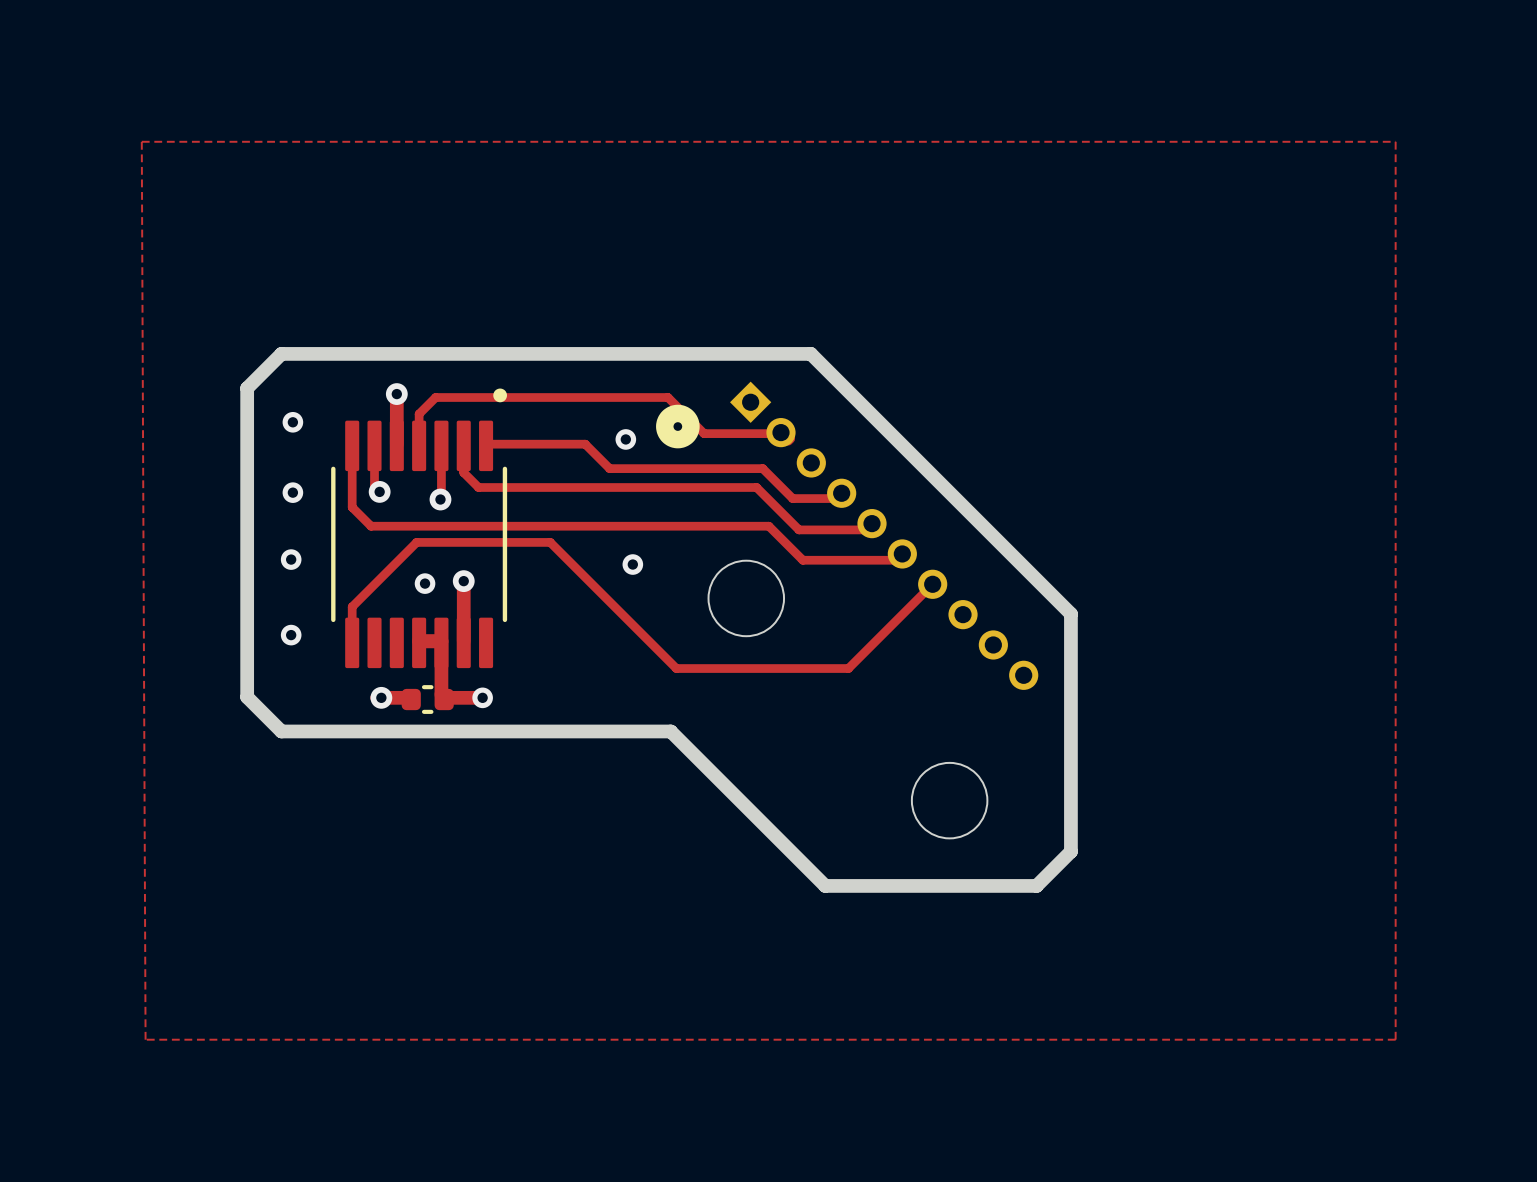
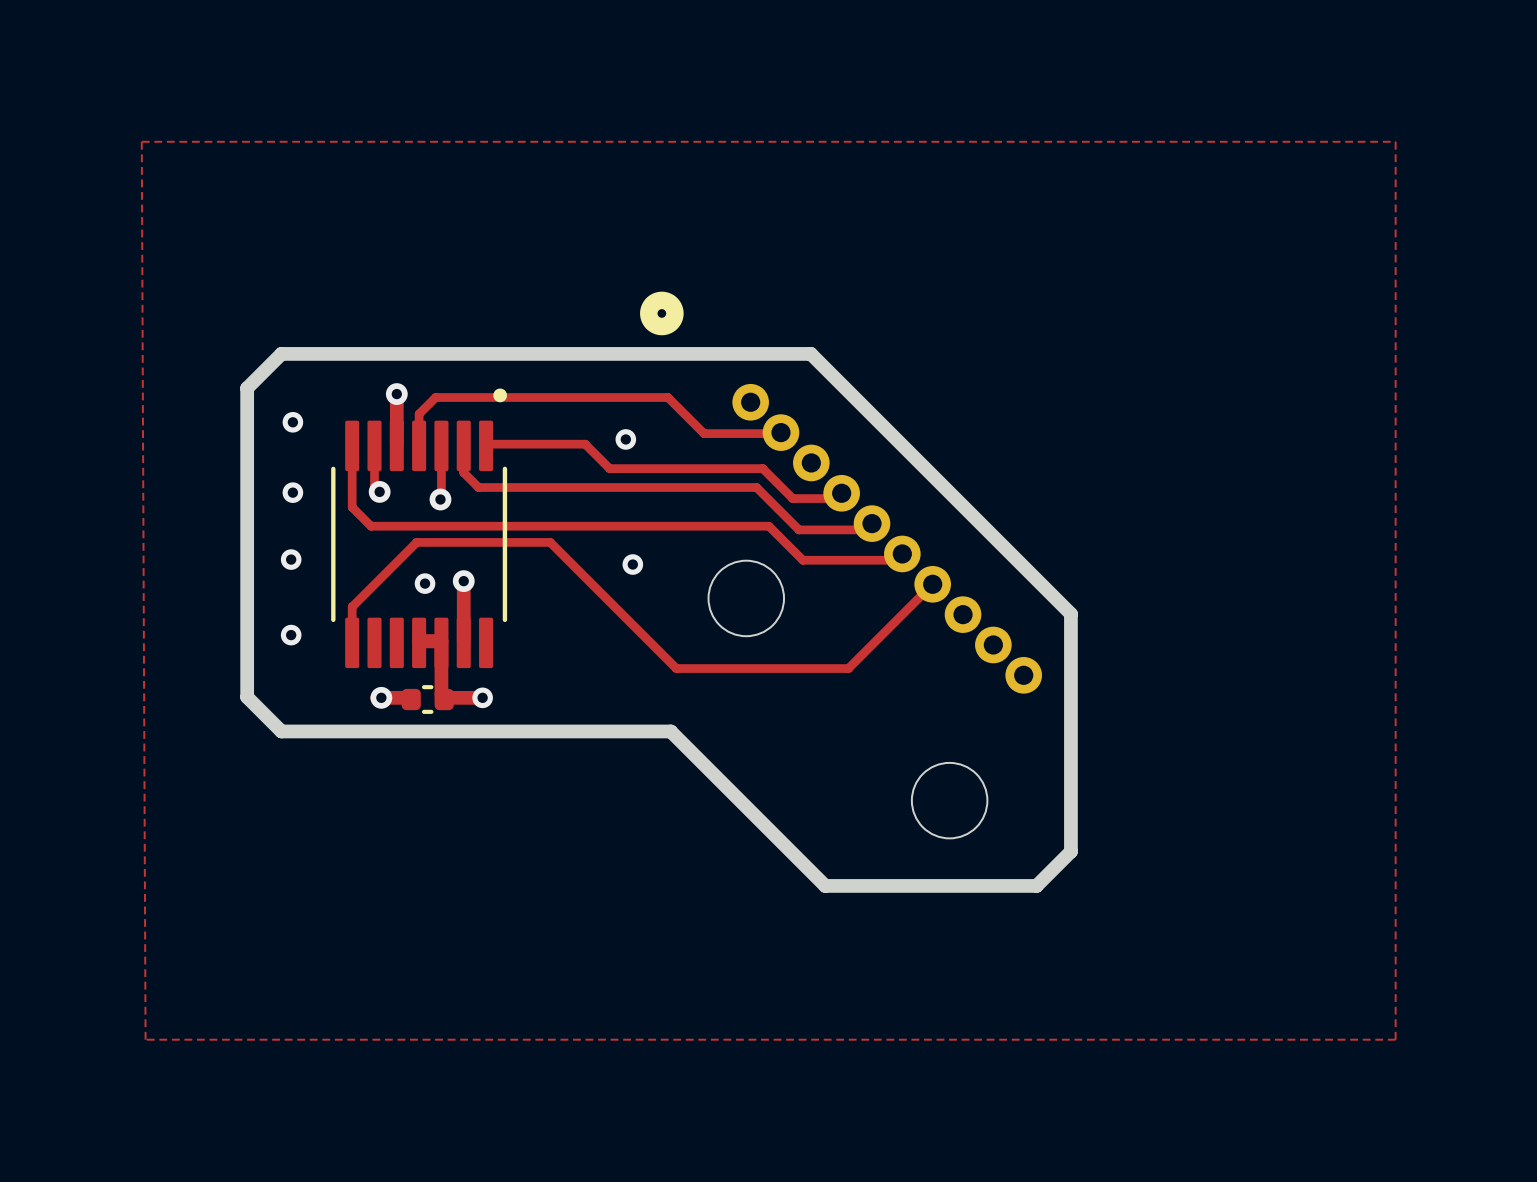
part: none -> (841, 492)
part: (847, 535) -> none

